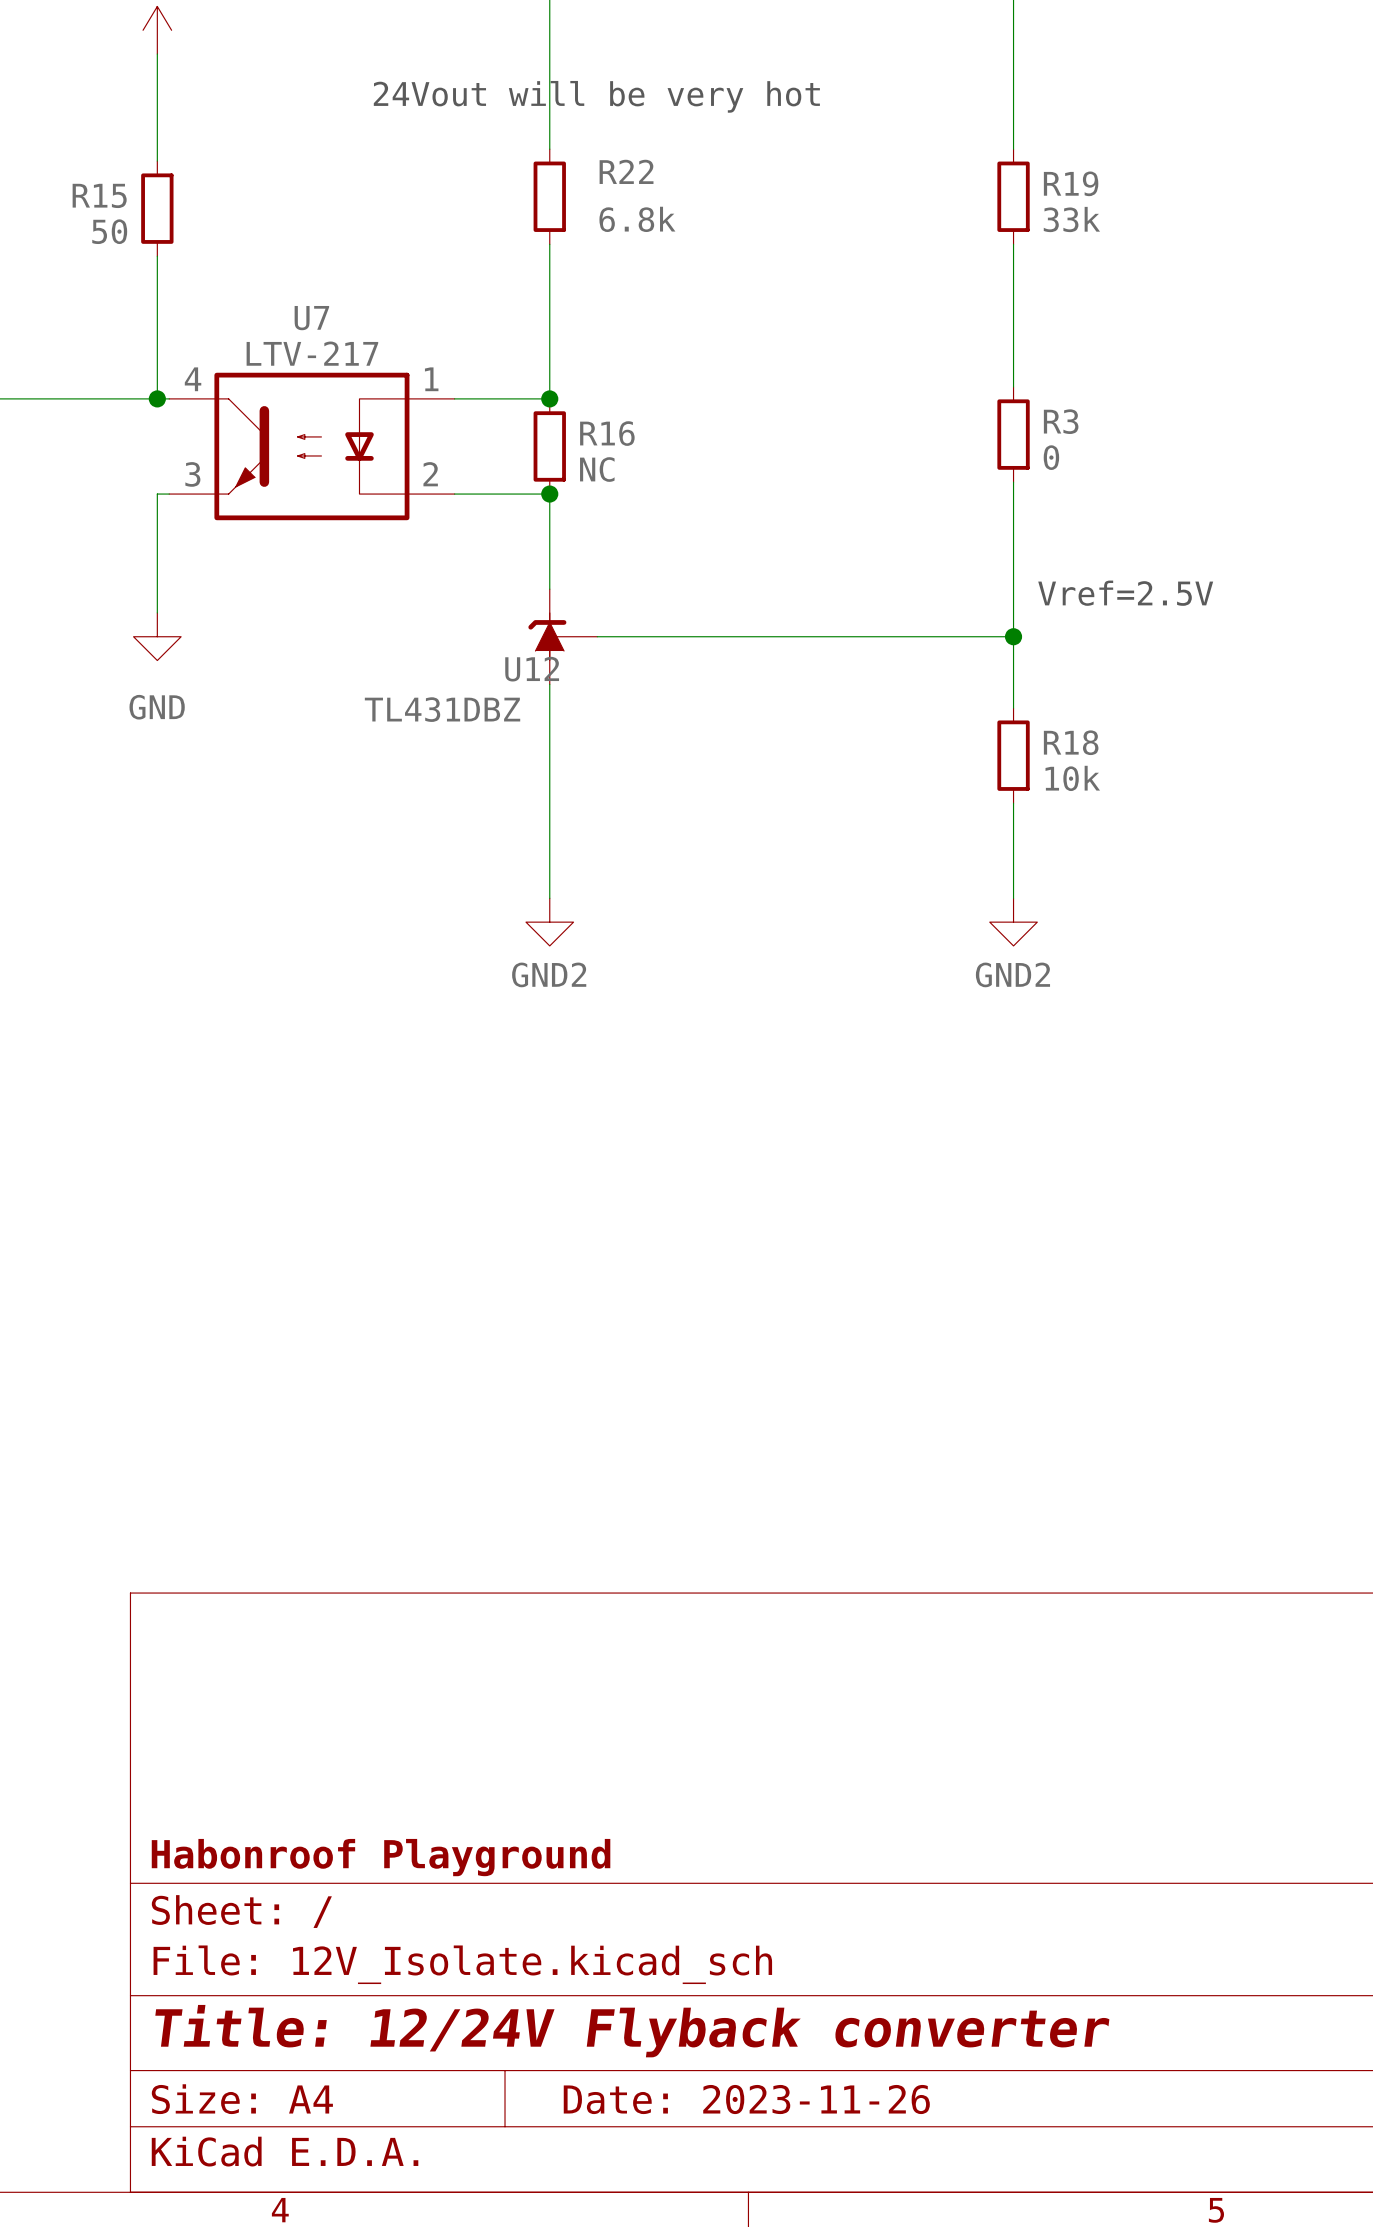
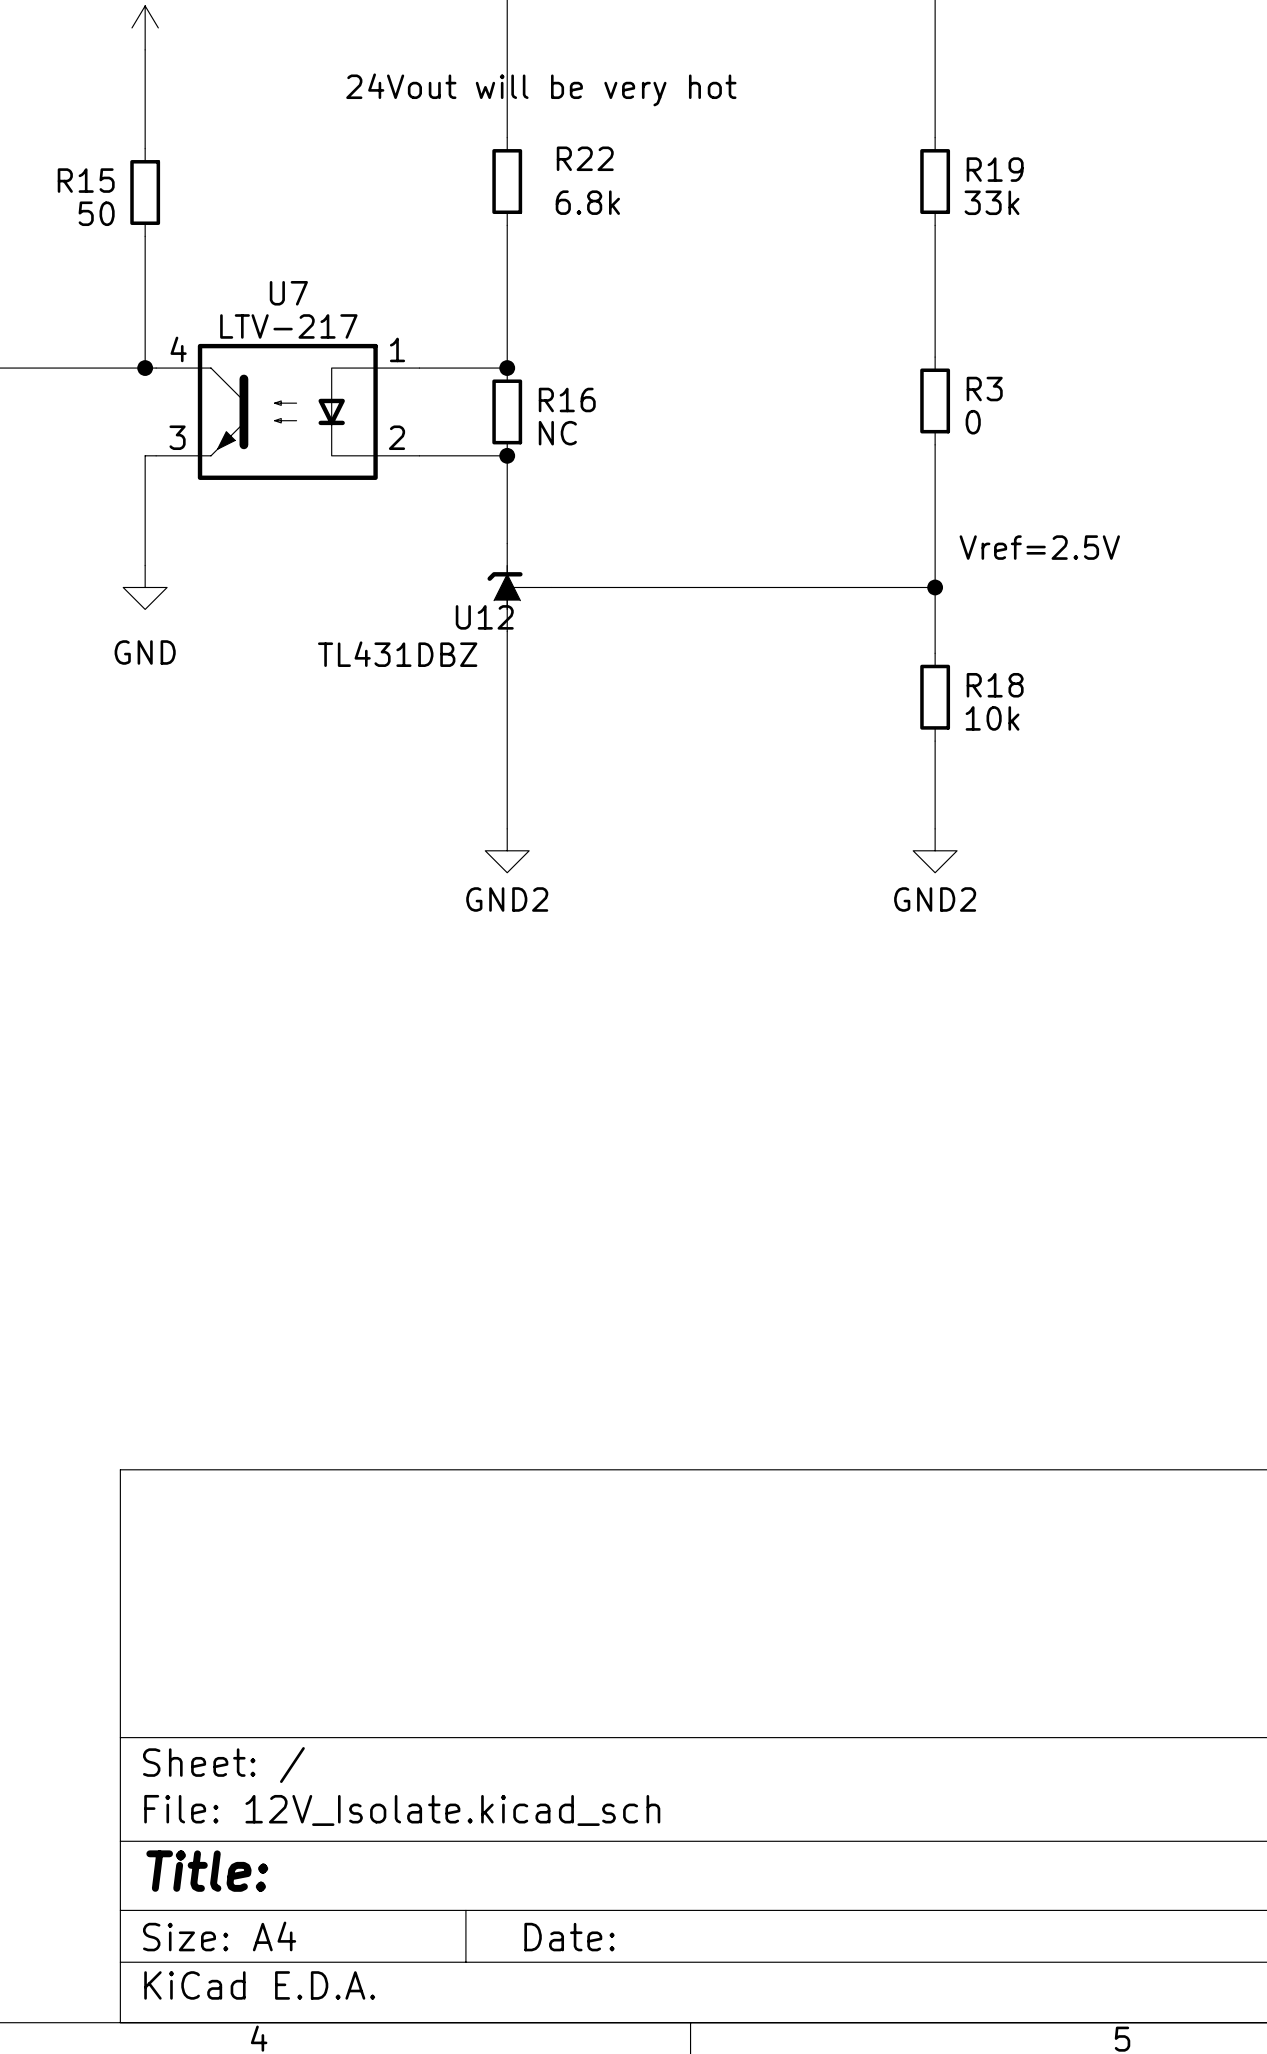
title block: Habonroof Playground (381, 1857) -> none
title block: Title: 12/24V Flyback converter (632, 2031) -> Title: (207, 1871)
title block: Date: 2023-11-26 (746, 2099) -> Date: (569, 1937)

